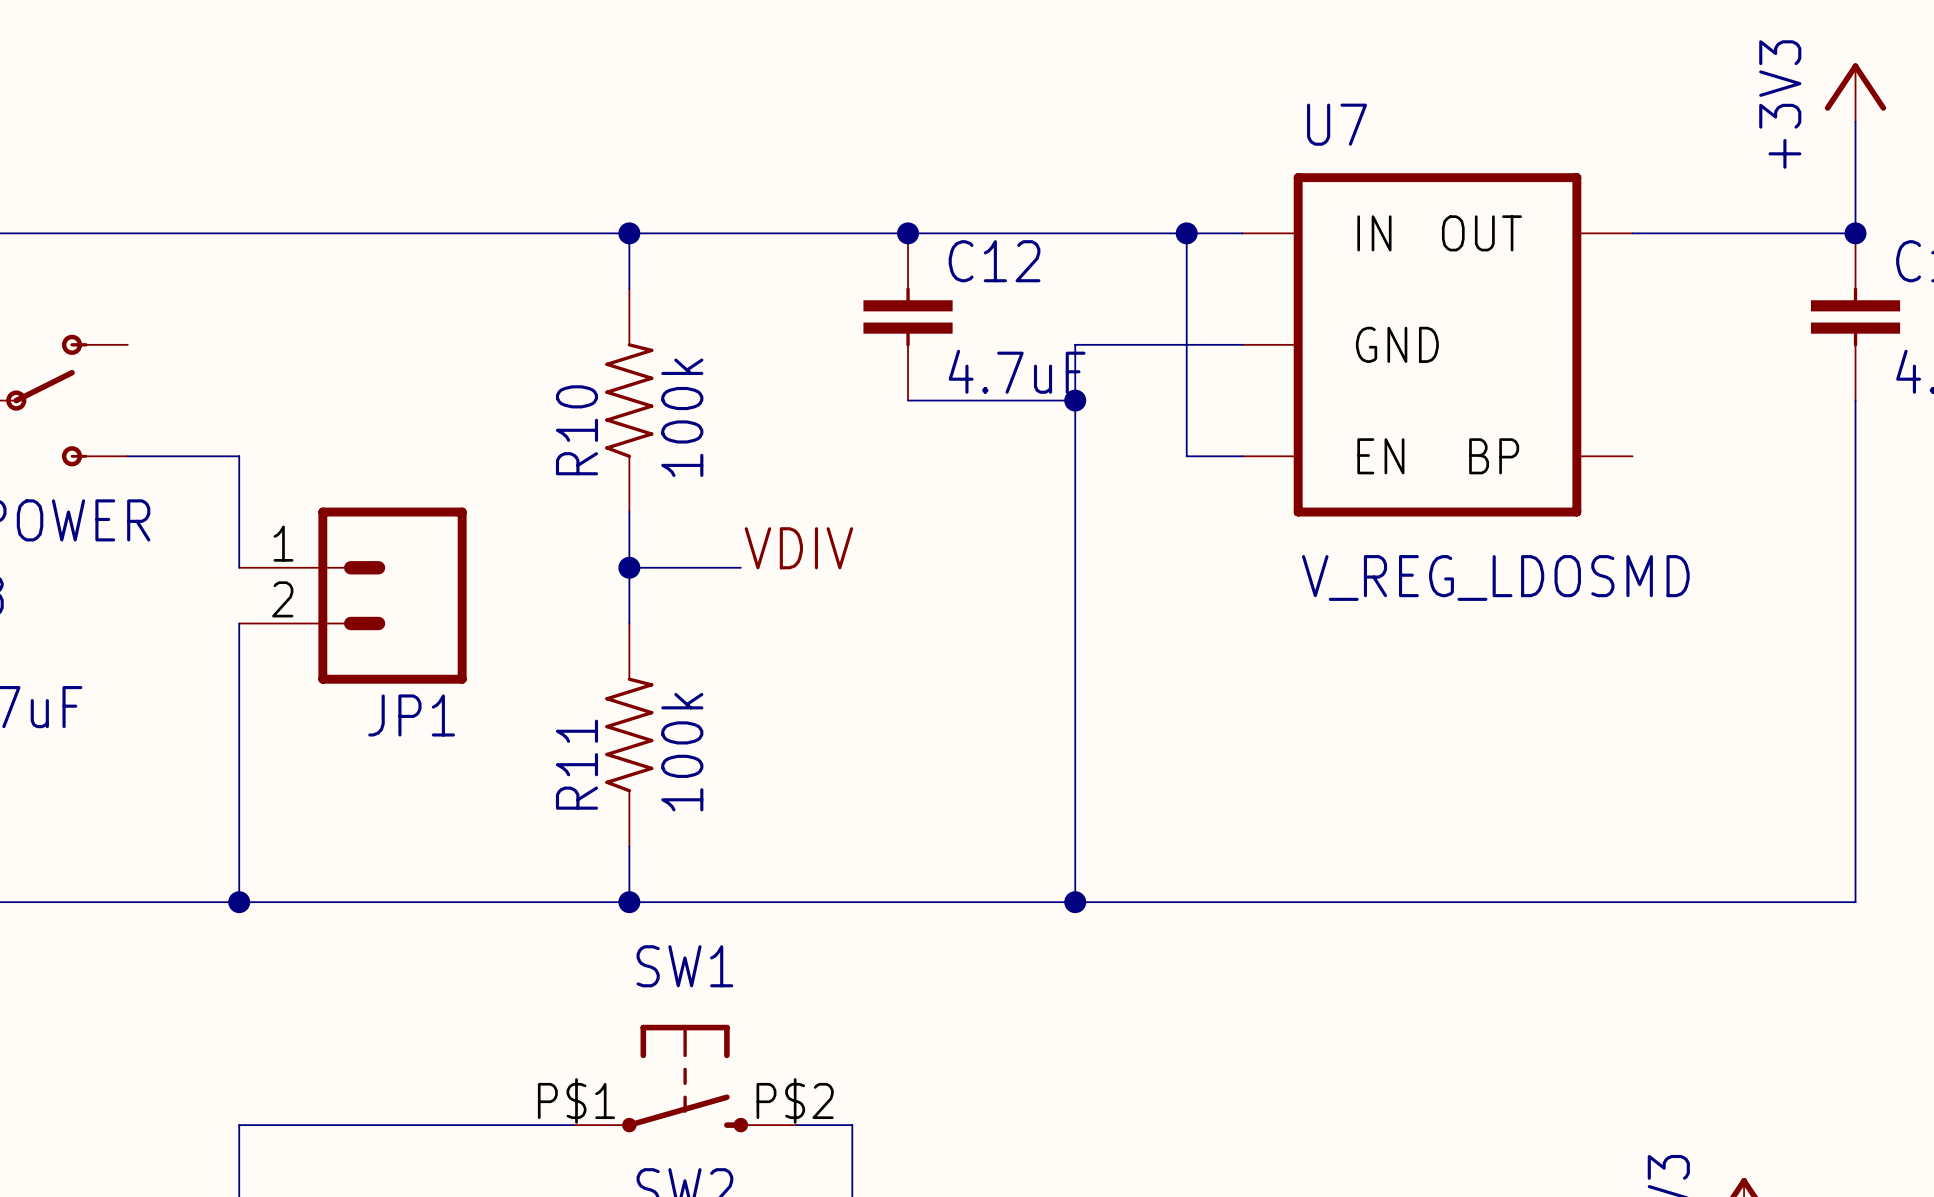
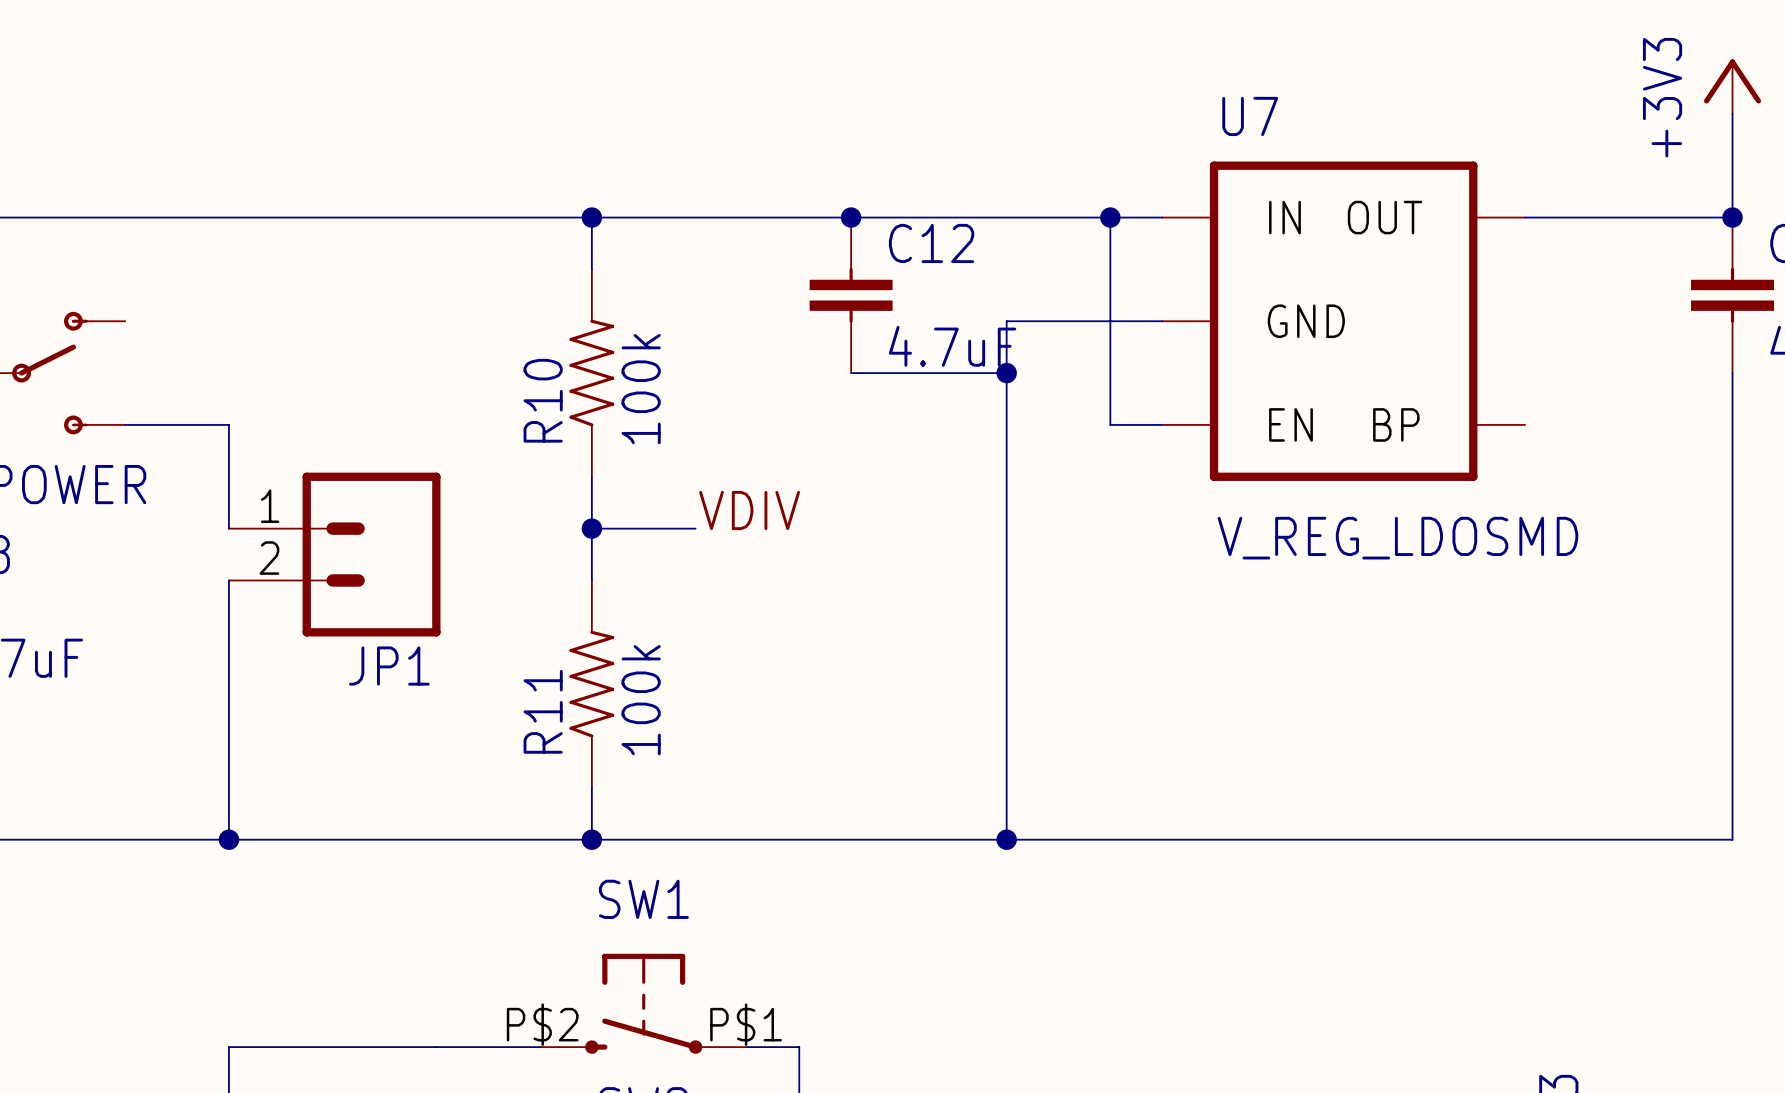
SW1 flip: as is (685, 1078) -> left-right (643, 1003)

